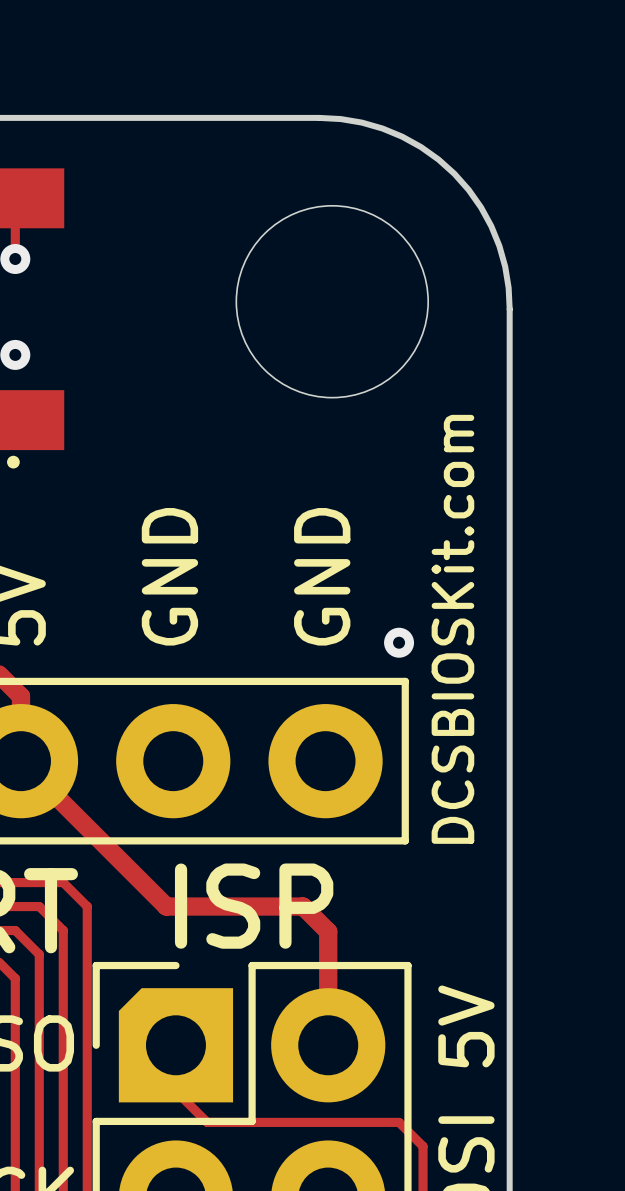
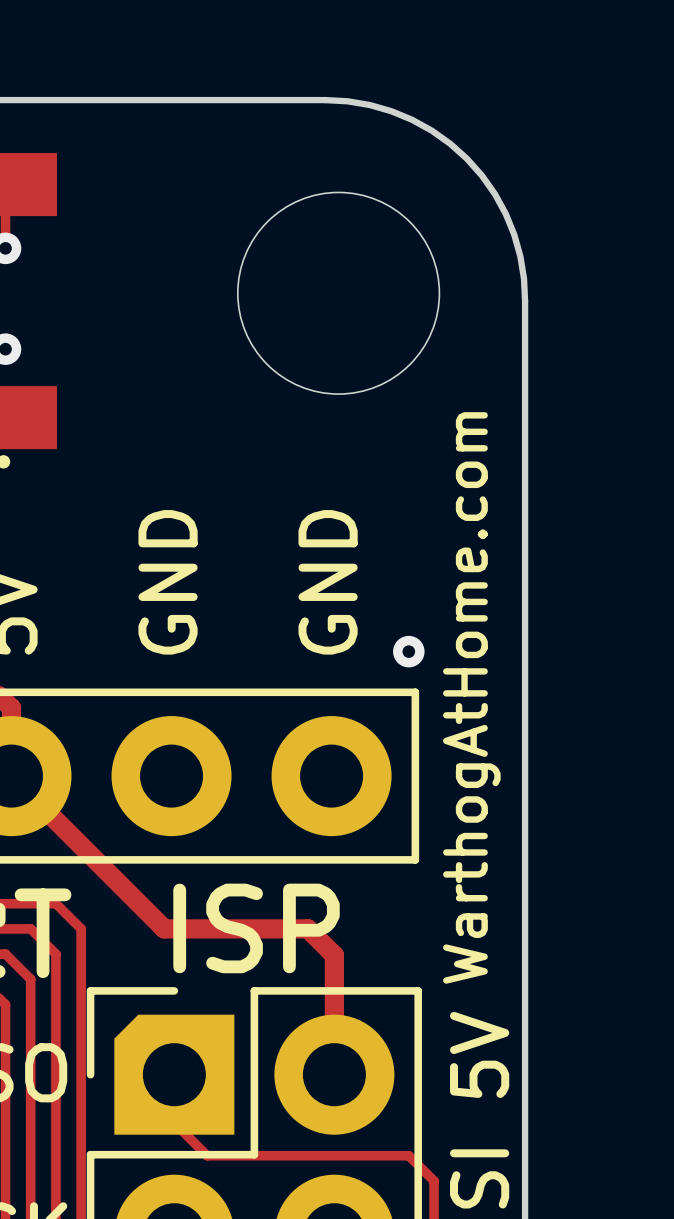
text: DCSBIOSKit.com (452, 629) -> WarthogAtHome.com (471, 697)

